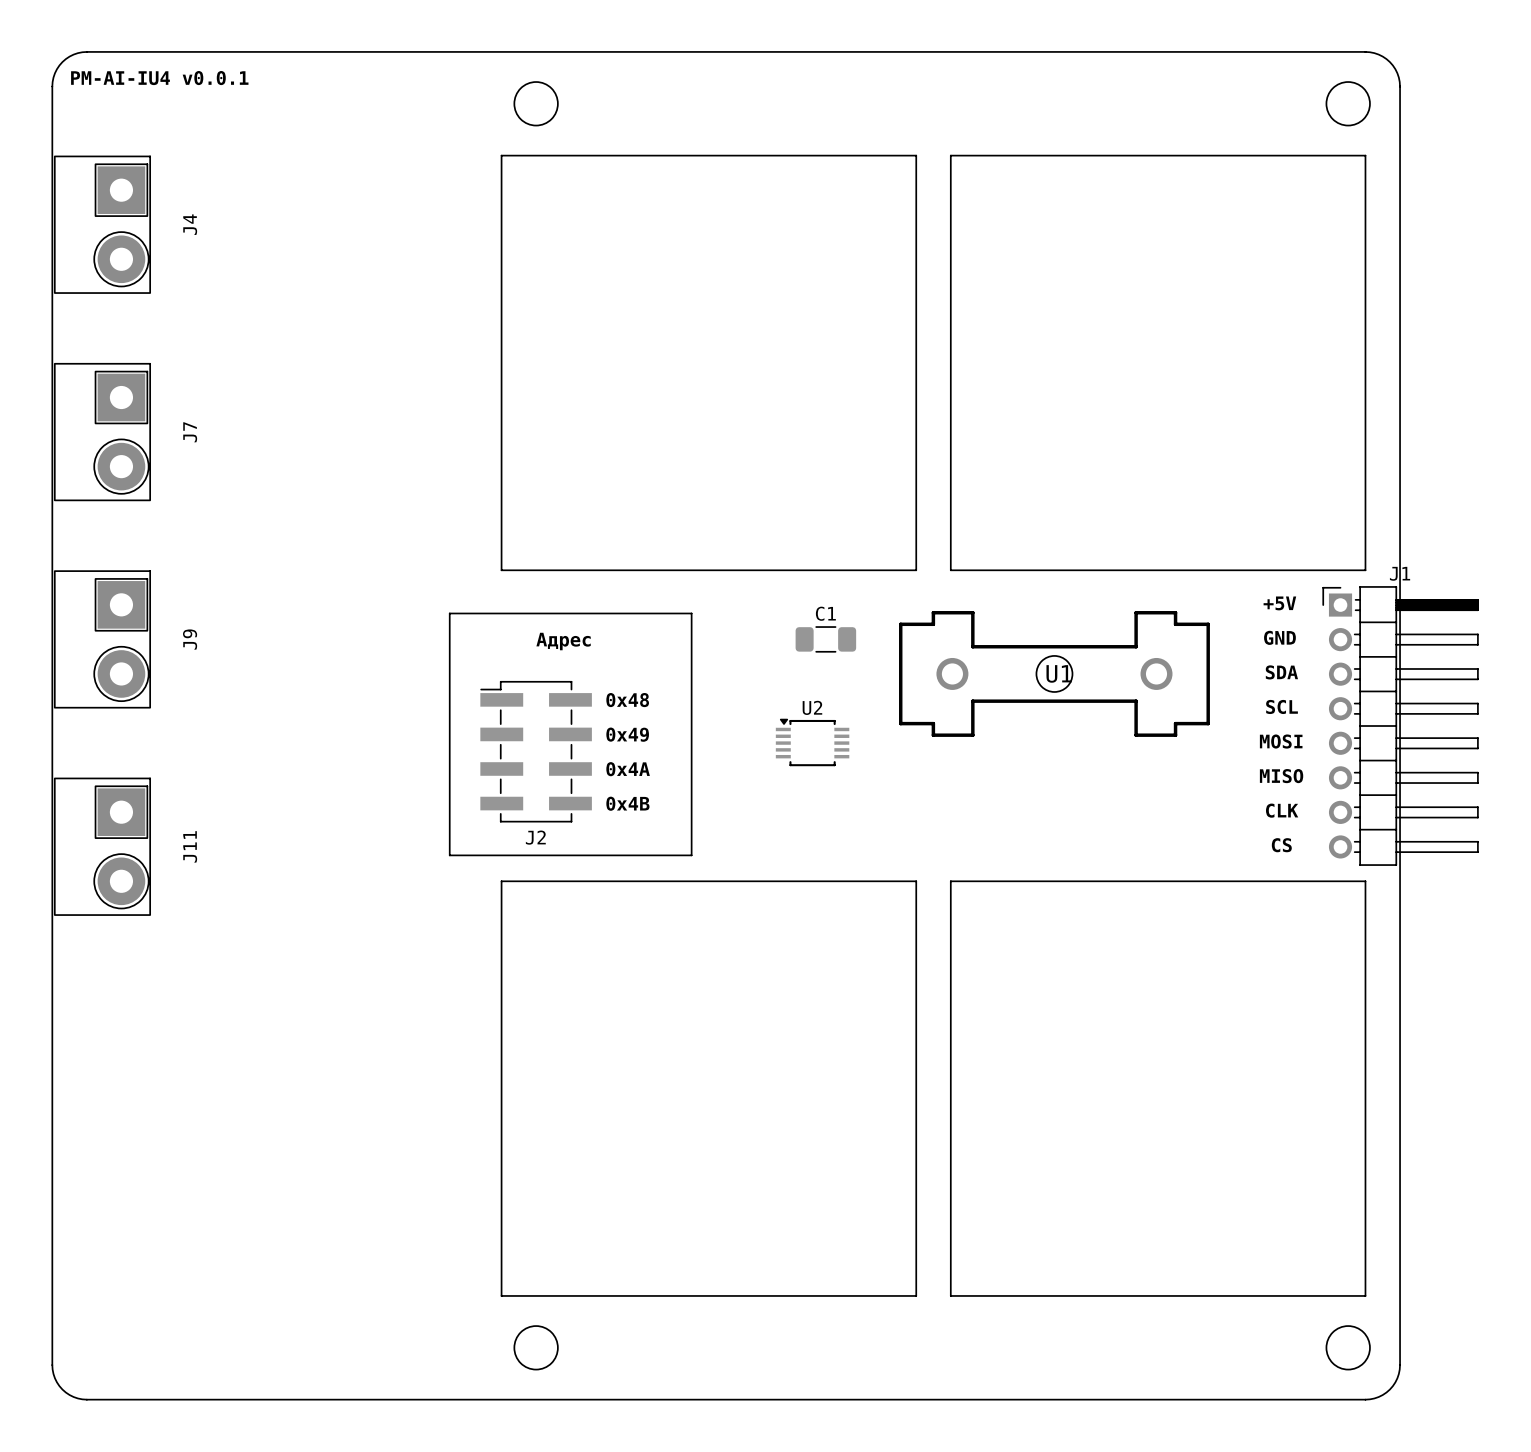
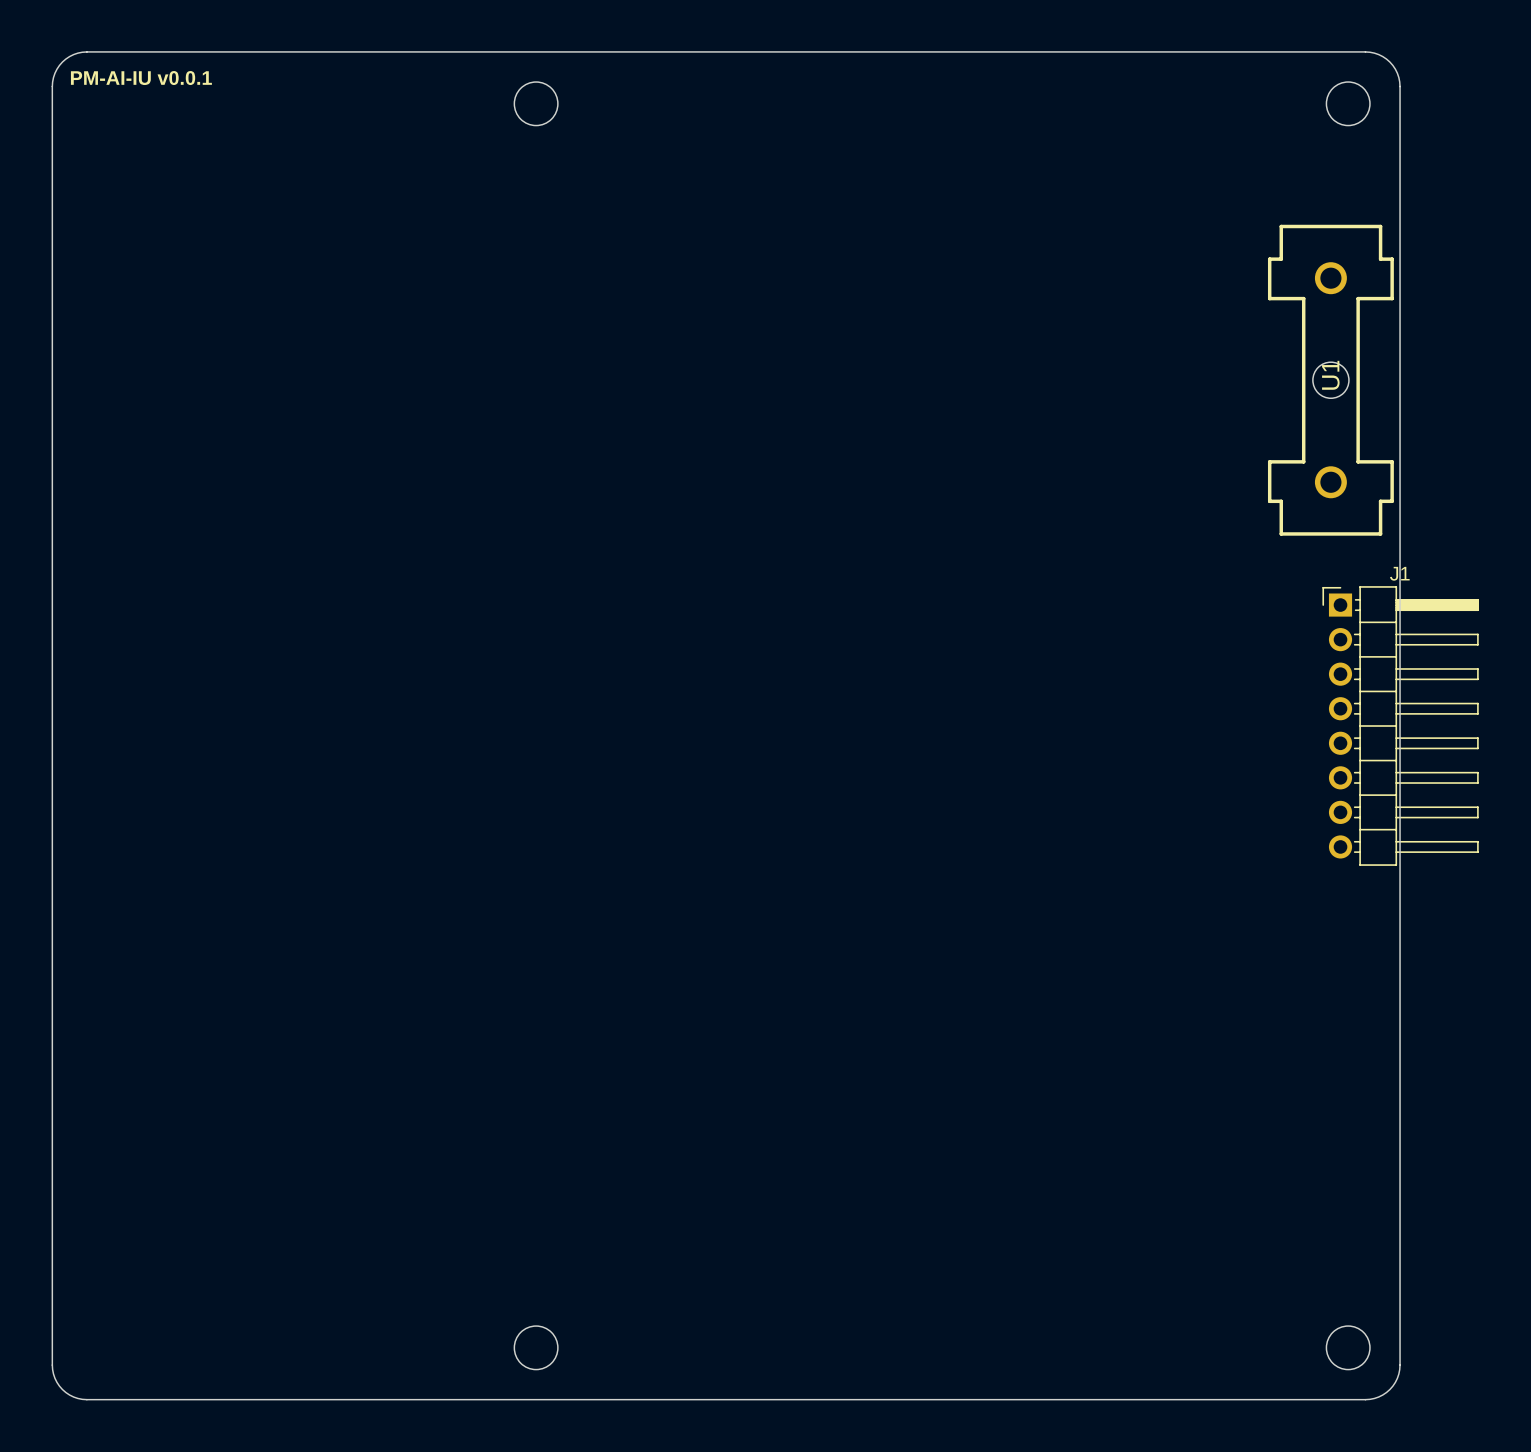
text: PM-AI-IU4 v0.0.1 (159, 78) -> PM-AI-IU v0.0.1 (141, 78)
line: (501, 155) (916, 155) (916, 570) (501, 570) (501, 155) -> none
line: (950, 155) (1365, 155) (1365, 570) (950, 570) (950, 155) -> none
J4: (102, 224) -> none
J7: (102, 432) -> none
text: +5V (1279, 603) -> none
line: (449, 613) (691, 613) (691, 855) (449, 855) (449, 613) -> none
text: GND (1279, 637) -> none
J9: (102, 639) -> none
C1: (825, 639) -> none
text: Адрес (563, 641) -> none
text: SDA (1281, 672) -> none
U1 rotation: 0° (1054, 673) -> 90° clockwise (1330, 380)
U1 position: (1054, 673) -> (1330, 380)
text: 0x48 (627, 700) -> none
text: SCL (1282, 706) -> none
text: 0x49 (627, 734) -> none
text: MOSI (1281, 741) -> none
U2: (812, 742) -> none
J2: (536, 751) -> none
text: 0x4A (628, 769) -> none
text: MISO (1281, 776) -> none
text: 0x4B (627, 803) -> none
text: CLK (1282, 810) -> none
text: CS (1281, 845) -> none
J11: (102, 846) -> none
line: (501, 881) (501, 1295) (916, 1295) (916, 881) (501, 881) -> none
line: (950, 881) (950, 1295) (1365, 1295) (1365, 881) (950, 881) -> none

